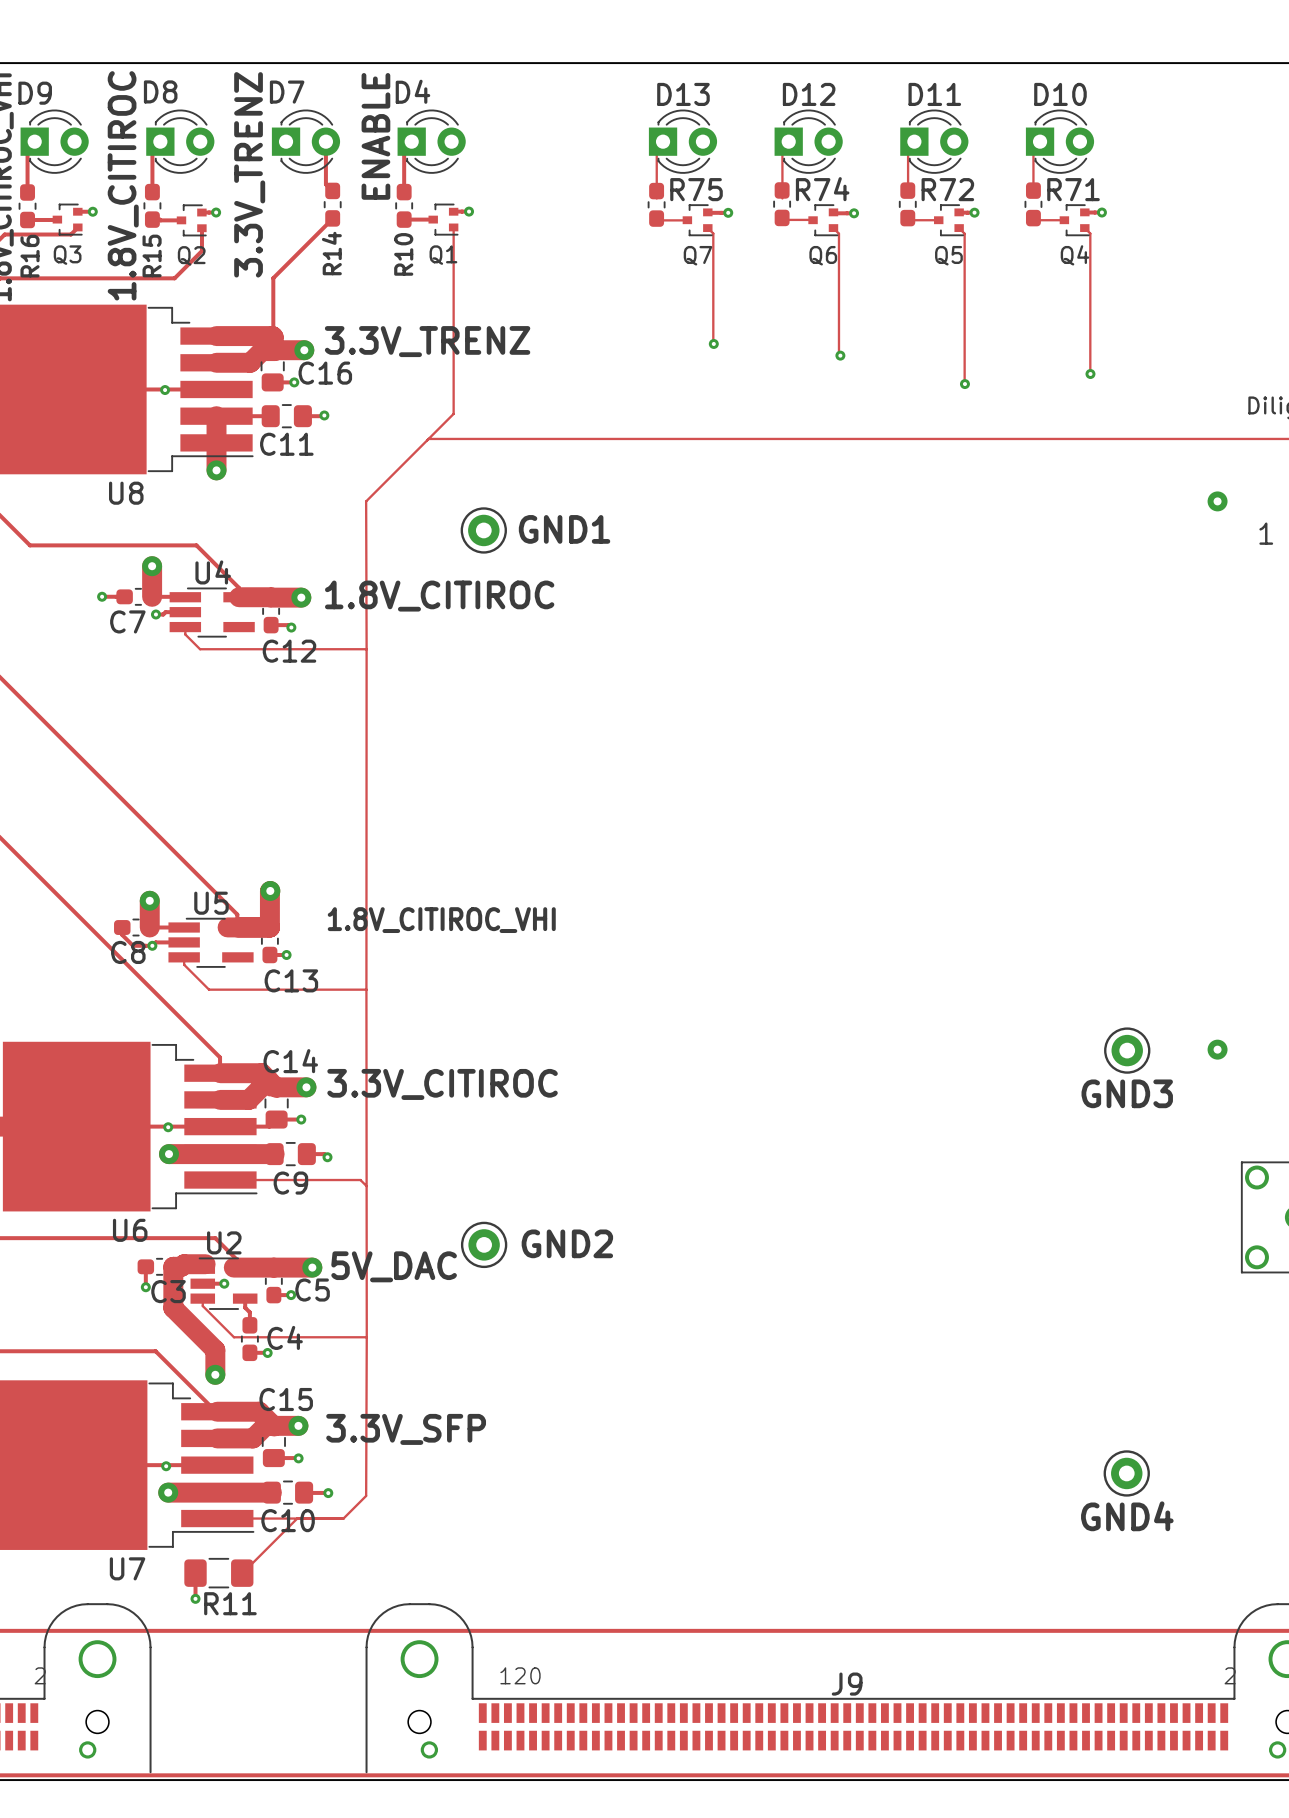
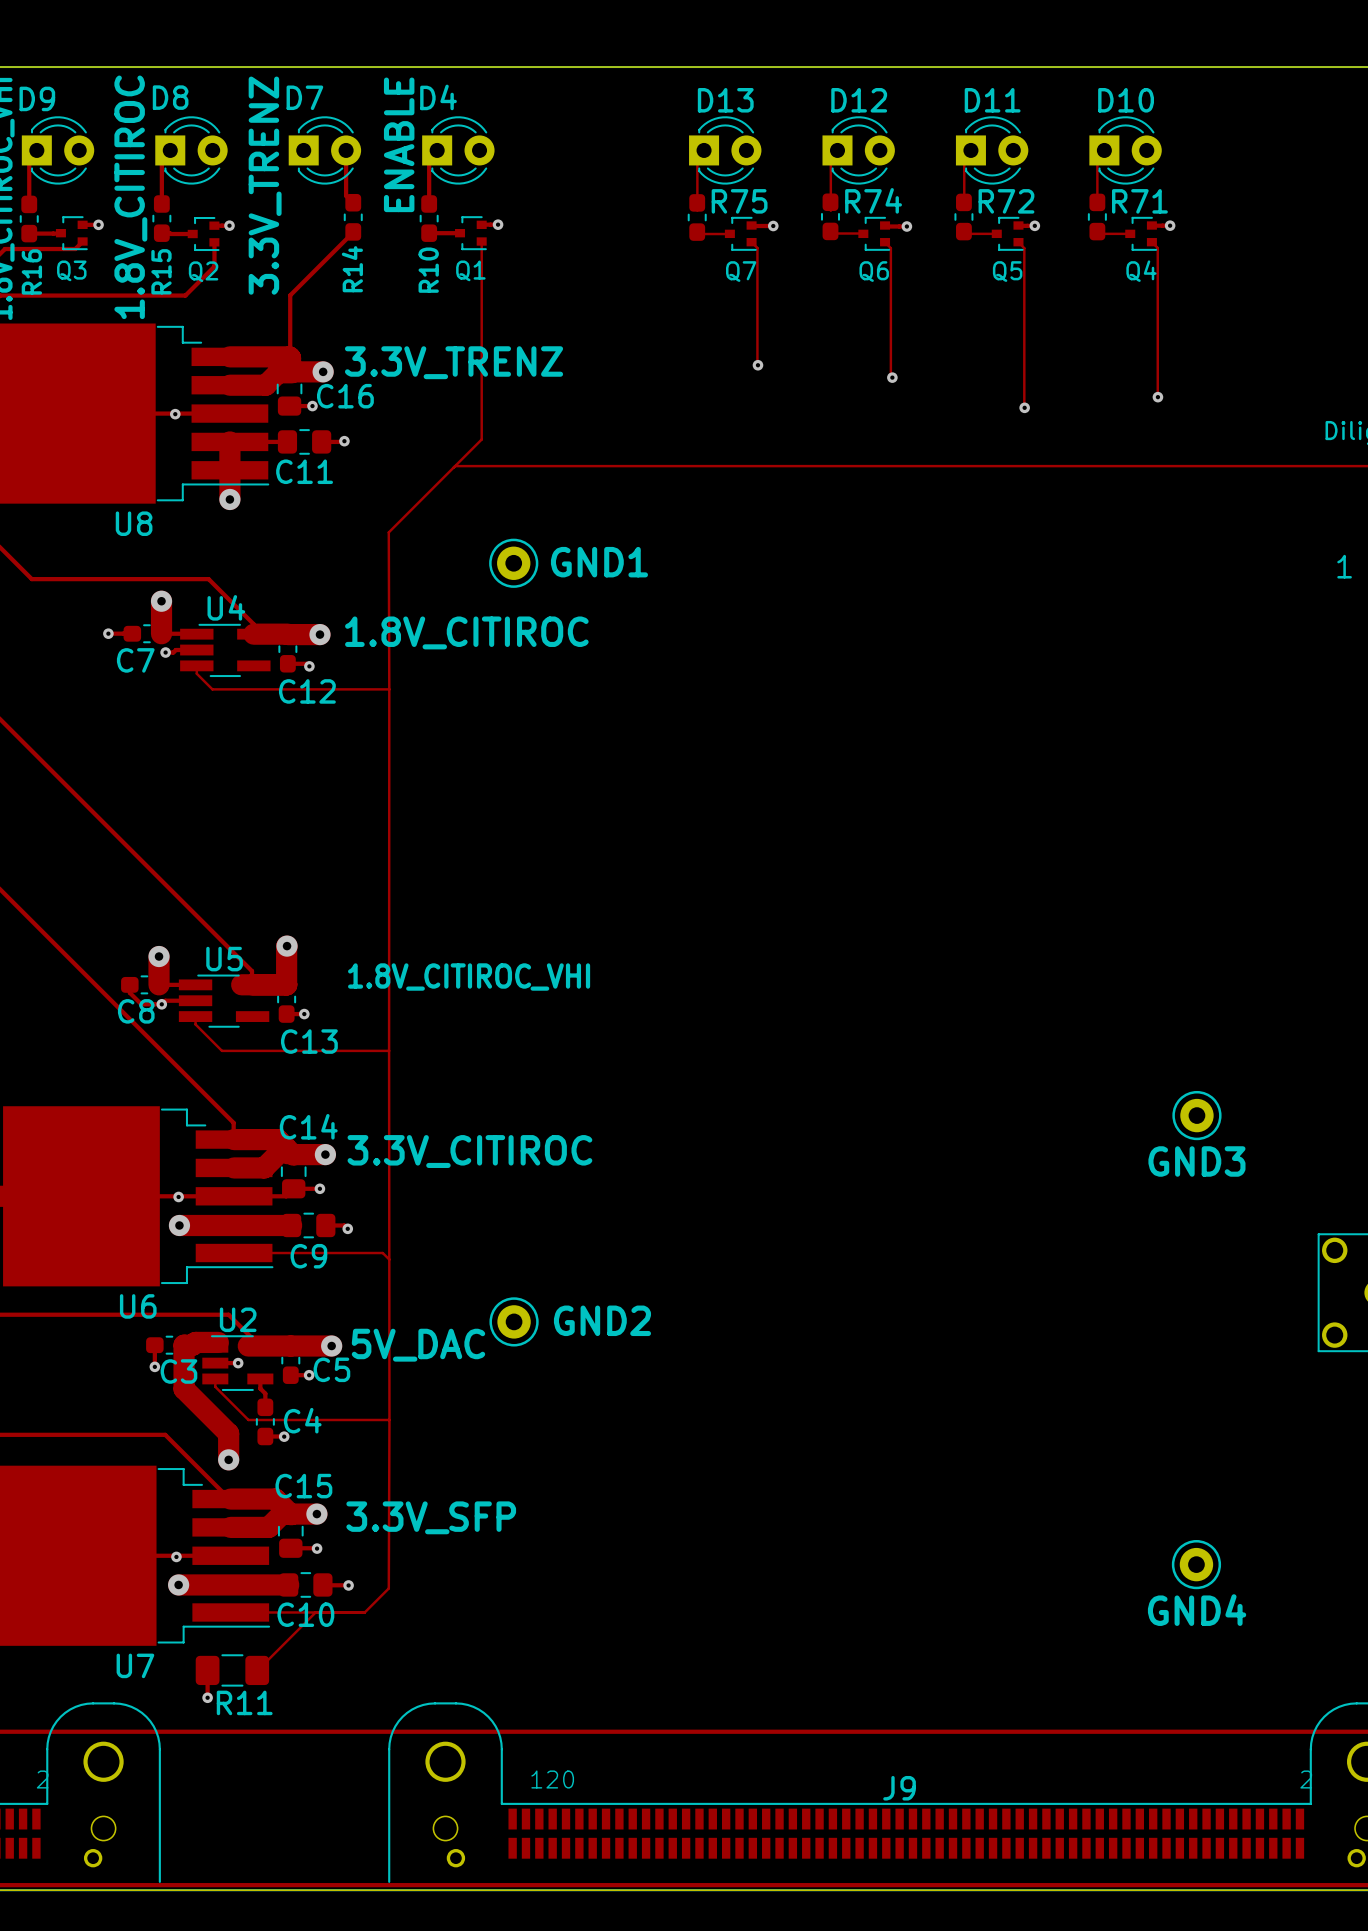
via: (1217, 501) -> none
via: (1217, 1049) -> none

